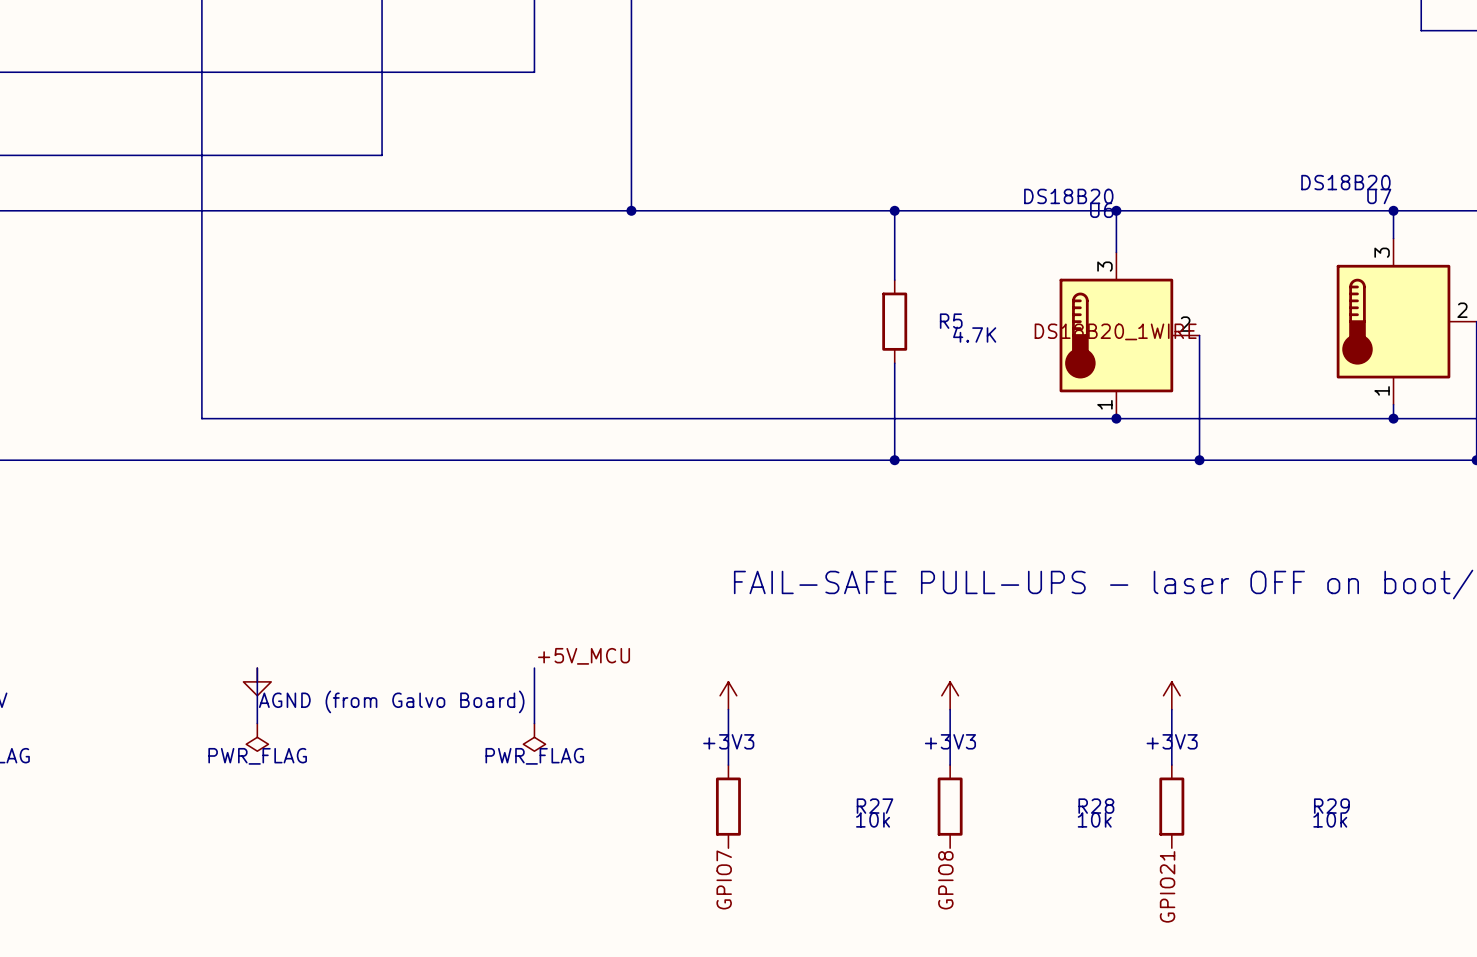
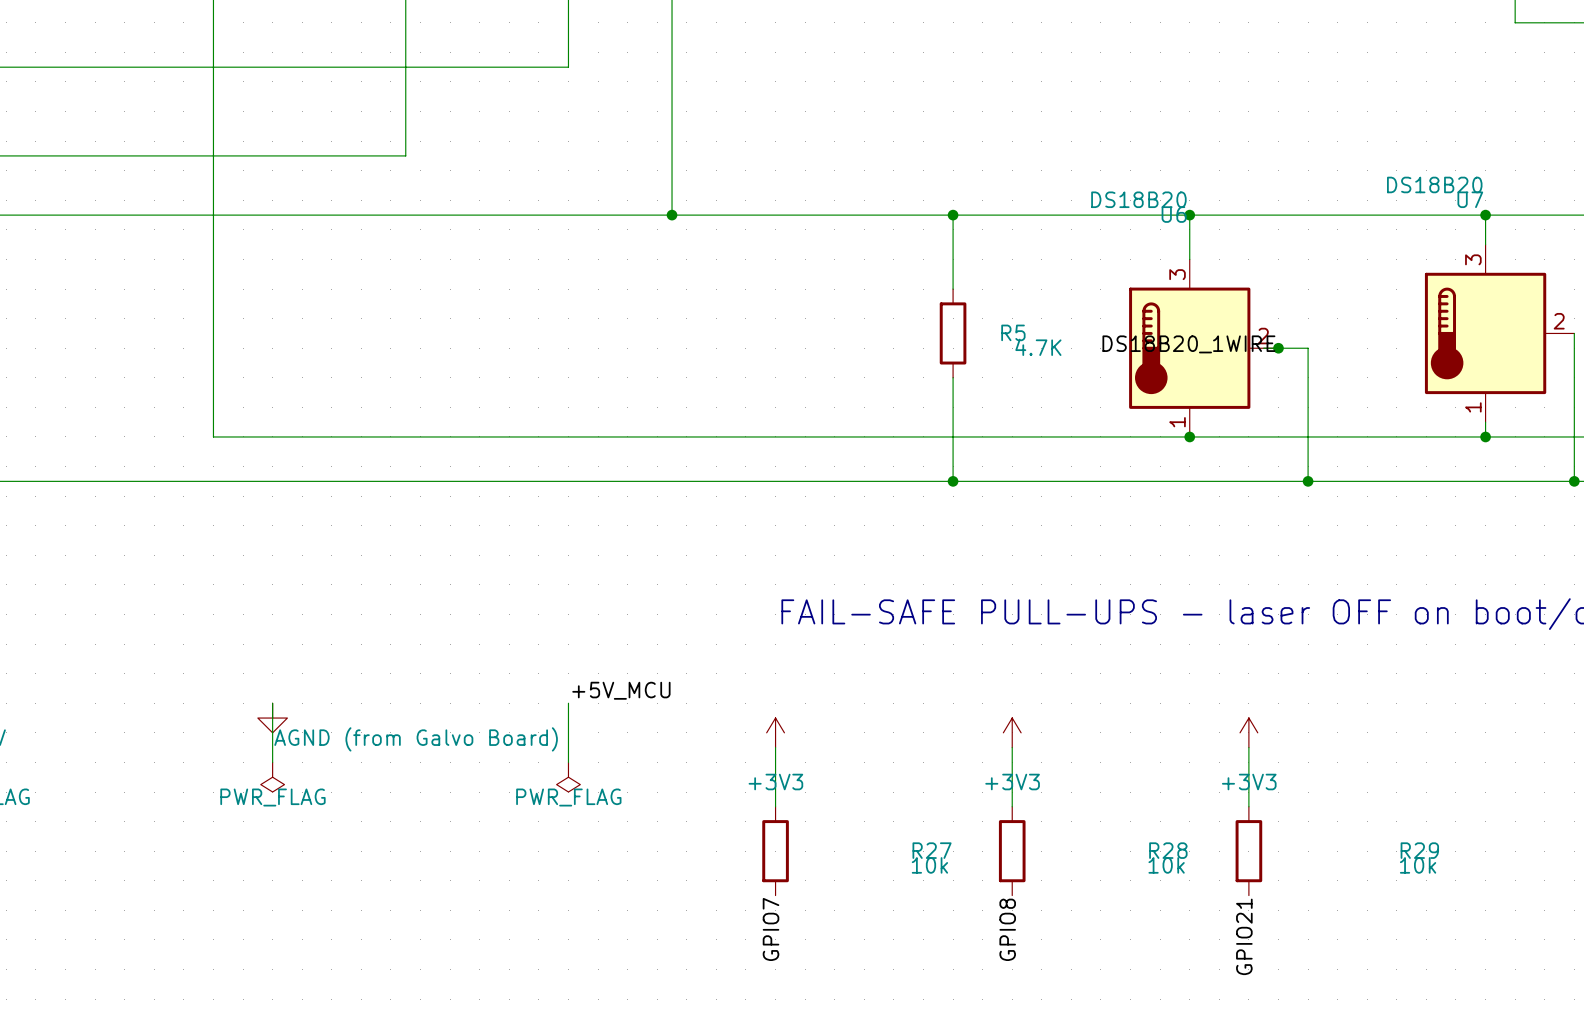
wire: none -> (1263, 348) (1308, 348) (1308, 481)
wire: (1199, 335) (1199, 460) -> none
junction: none -> (1278, 348)
junction position: (1199, 460) -> (1308, 481)

